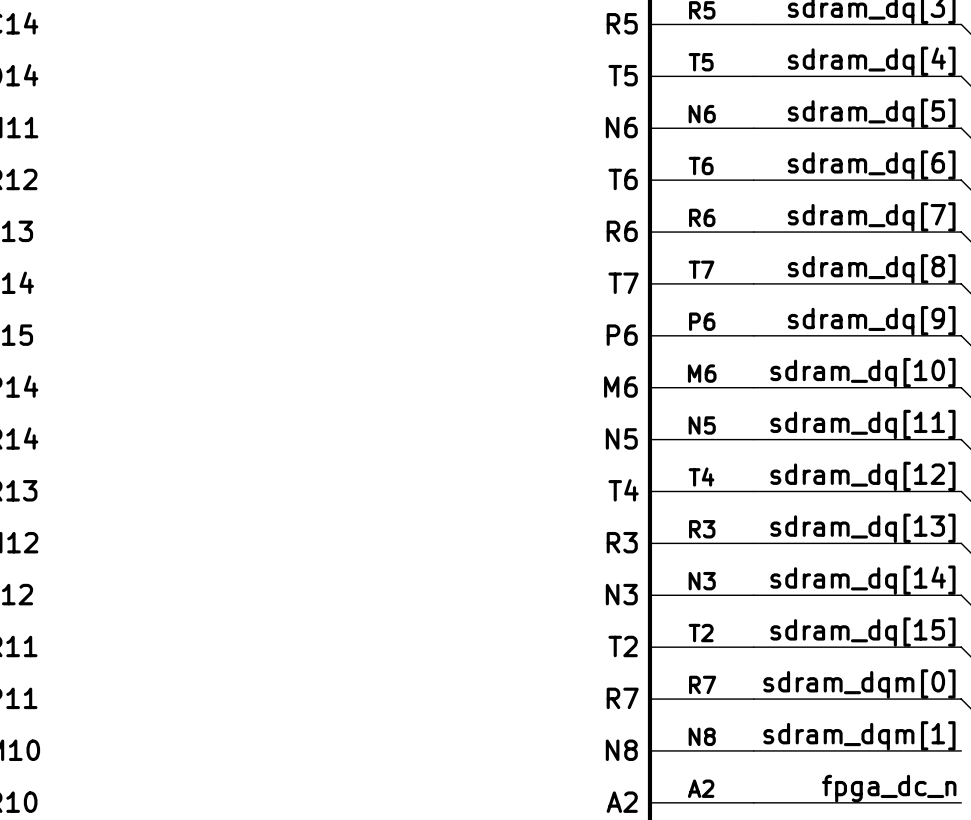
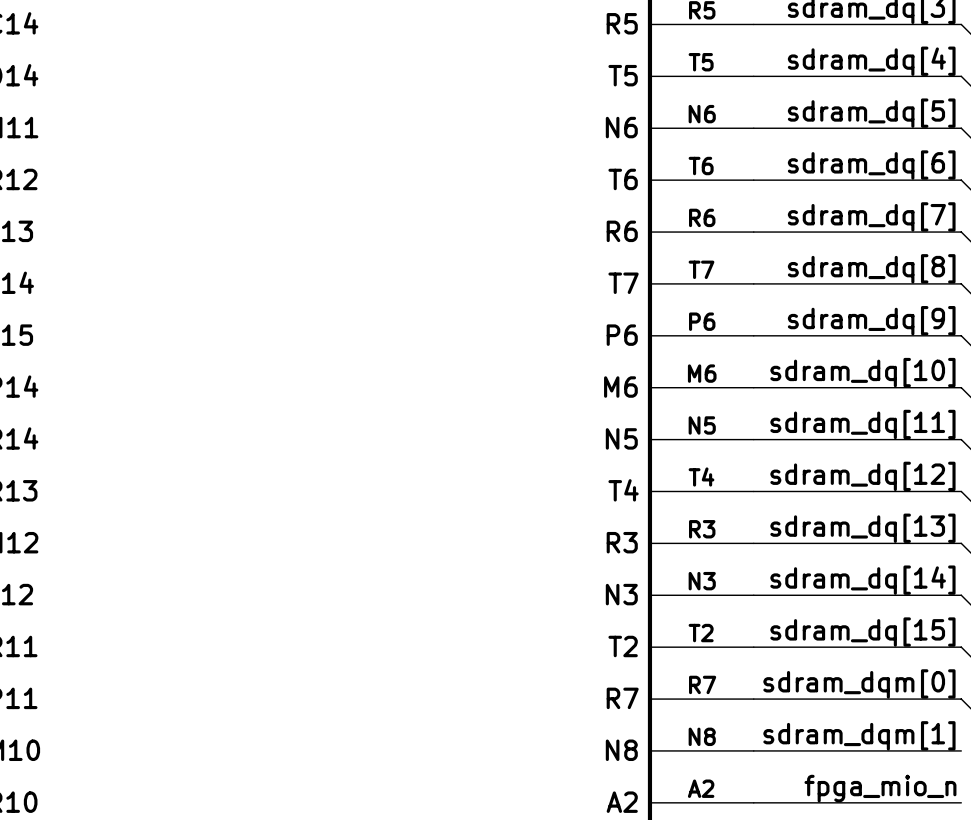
label: fpga_dc_n (889, 788) -> fpga_mio_n (880, 788)

